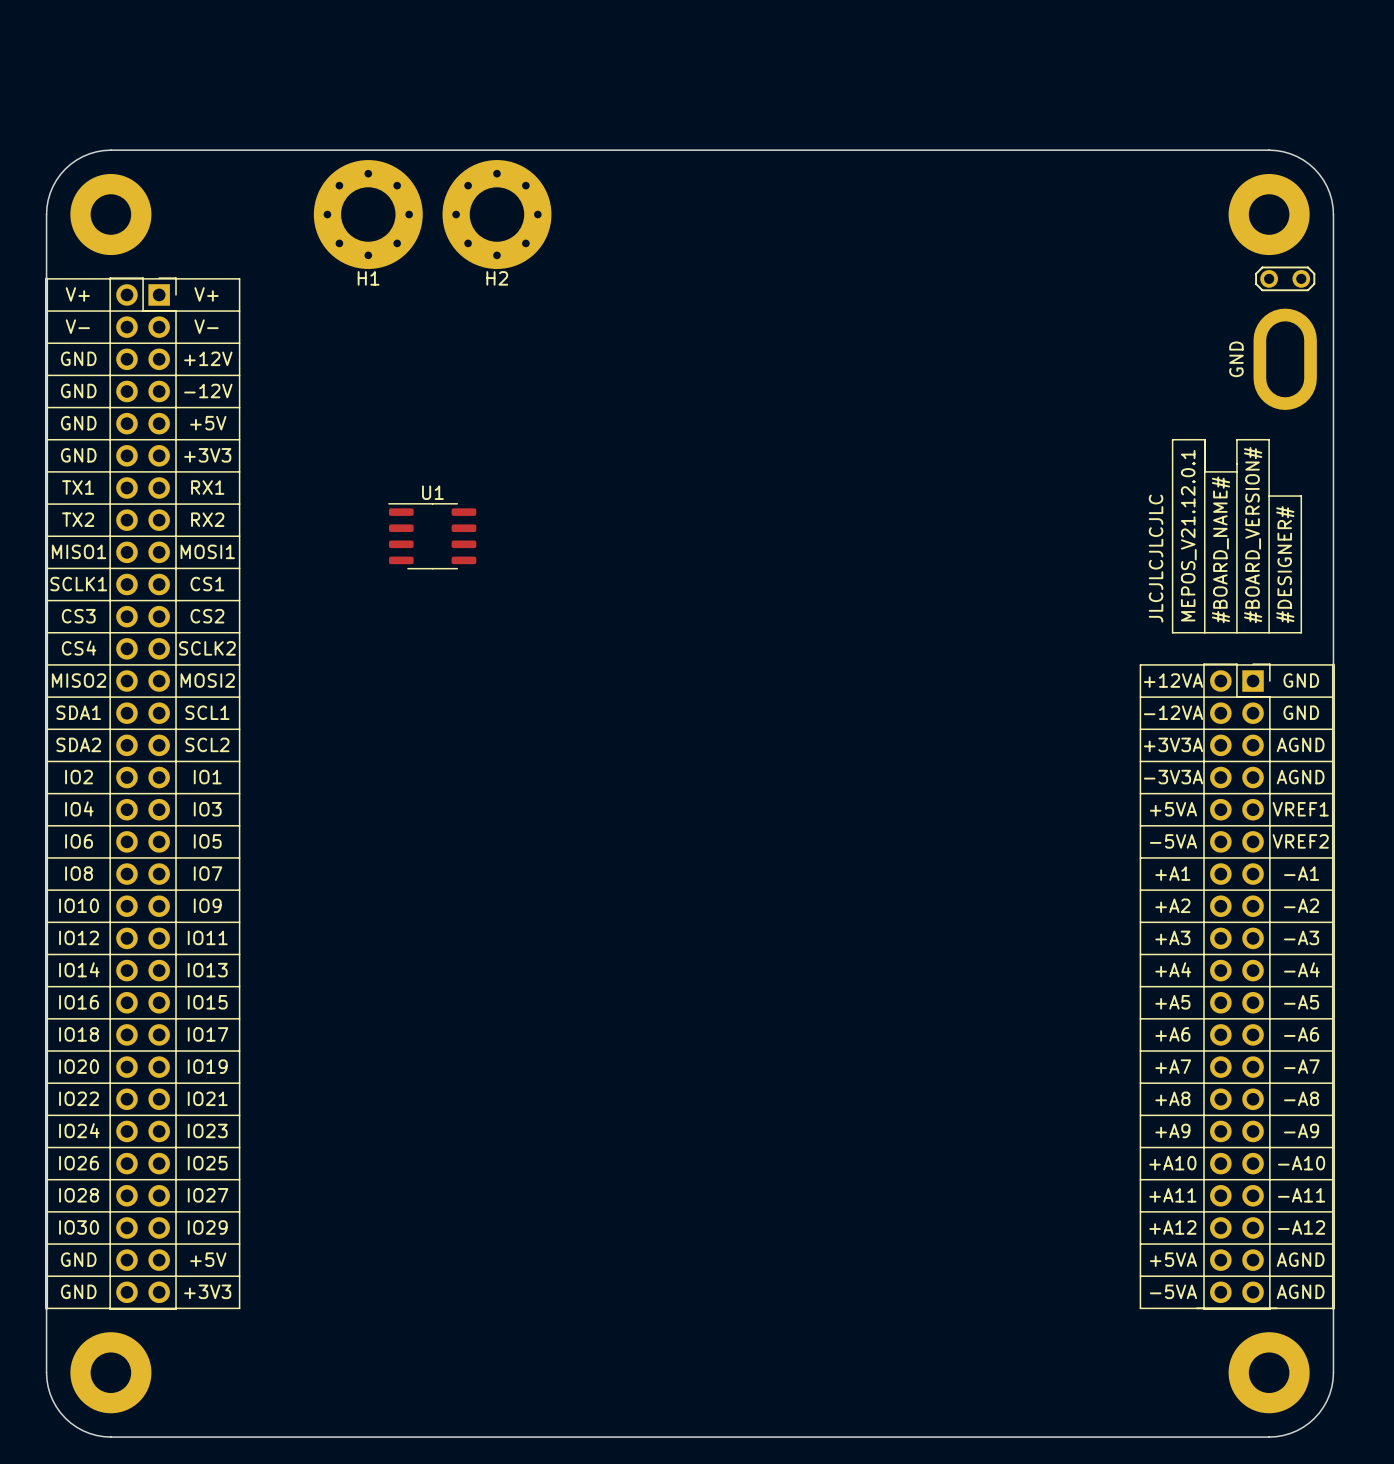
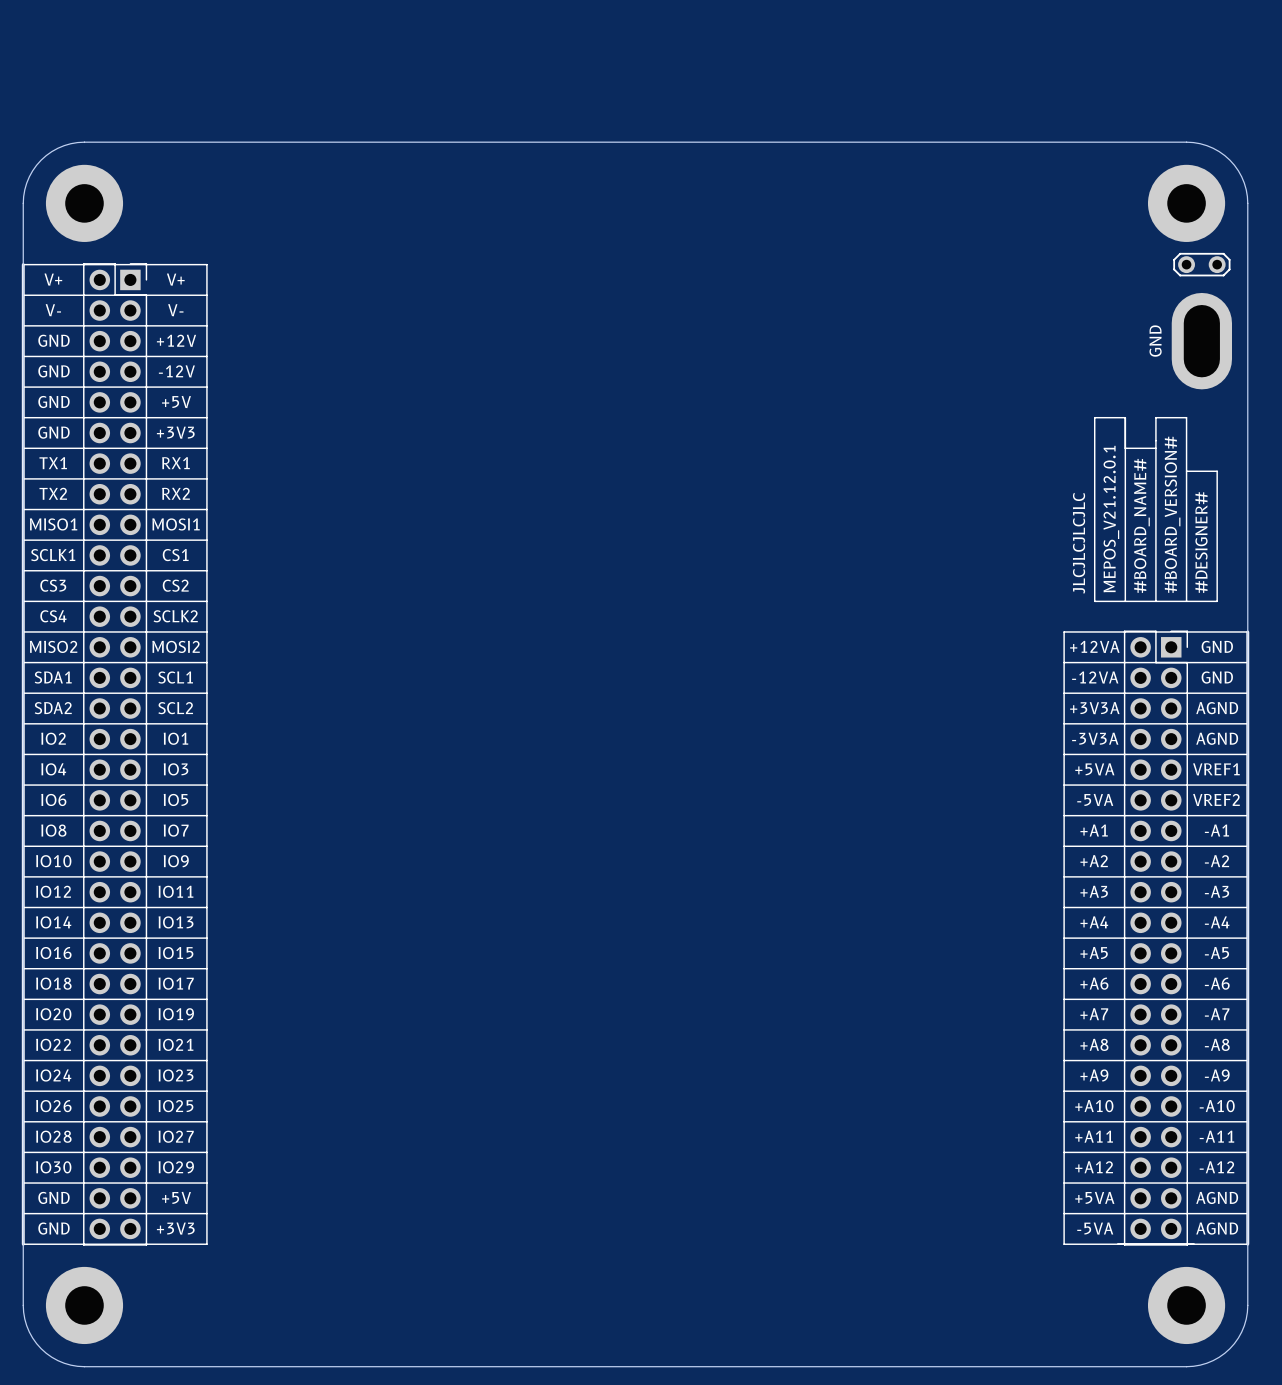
H1: (368, 214) -> none
H2: (496, 214) -> none
U1: (432, 536) -> none

